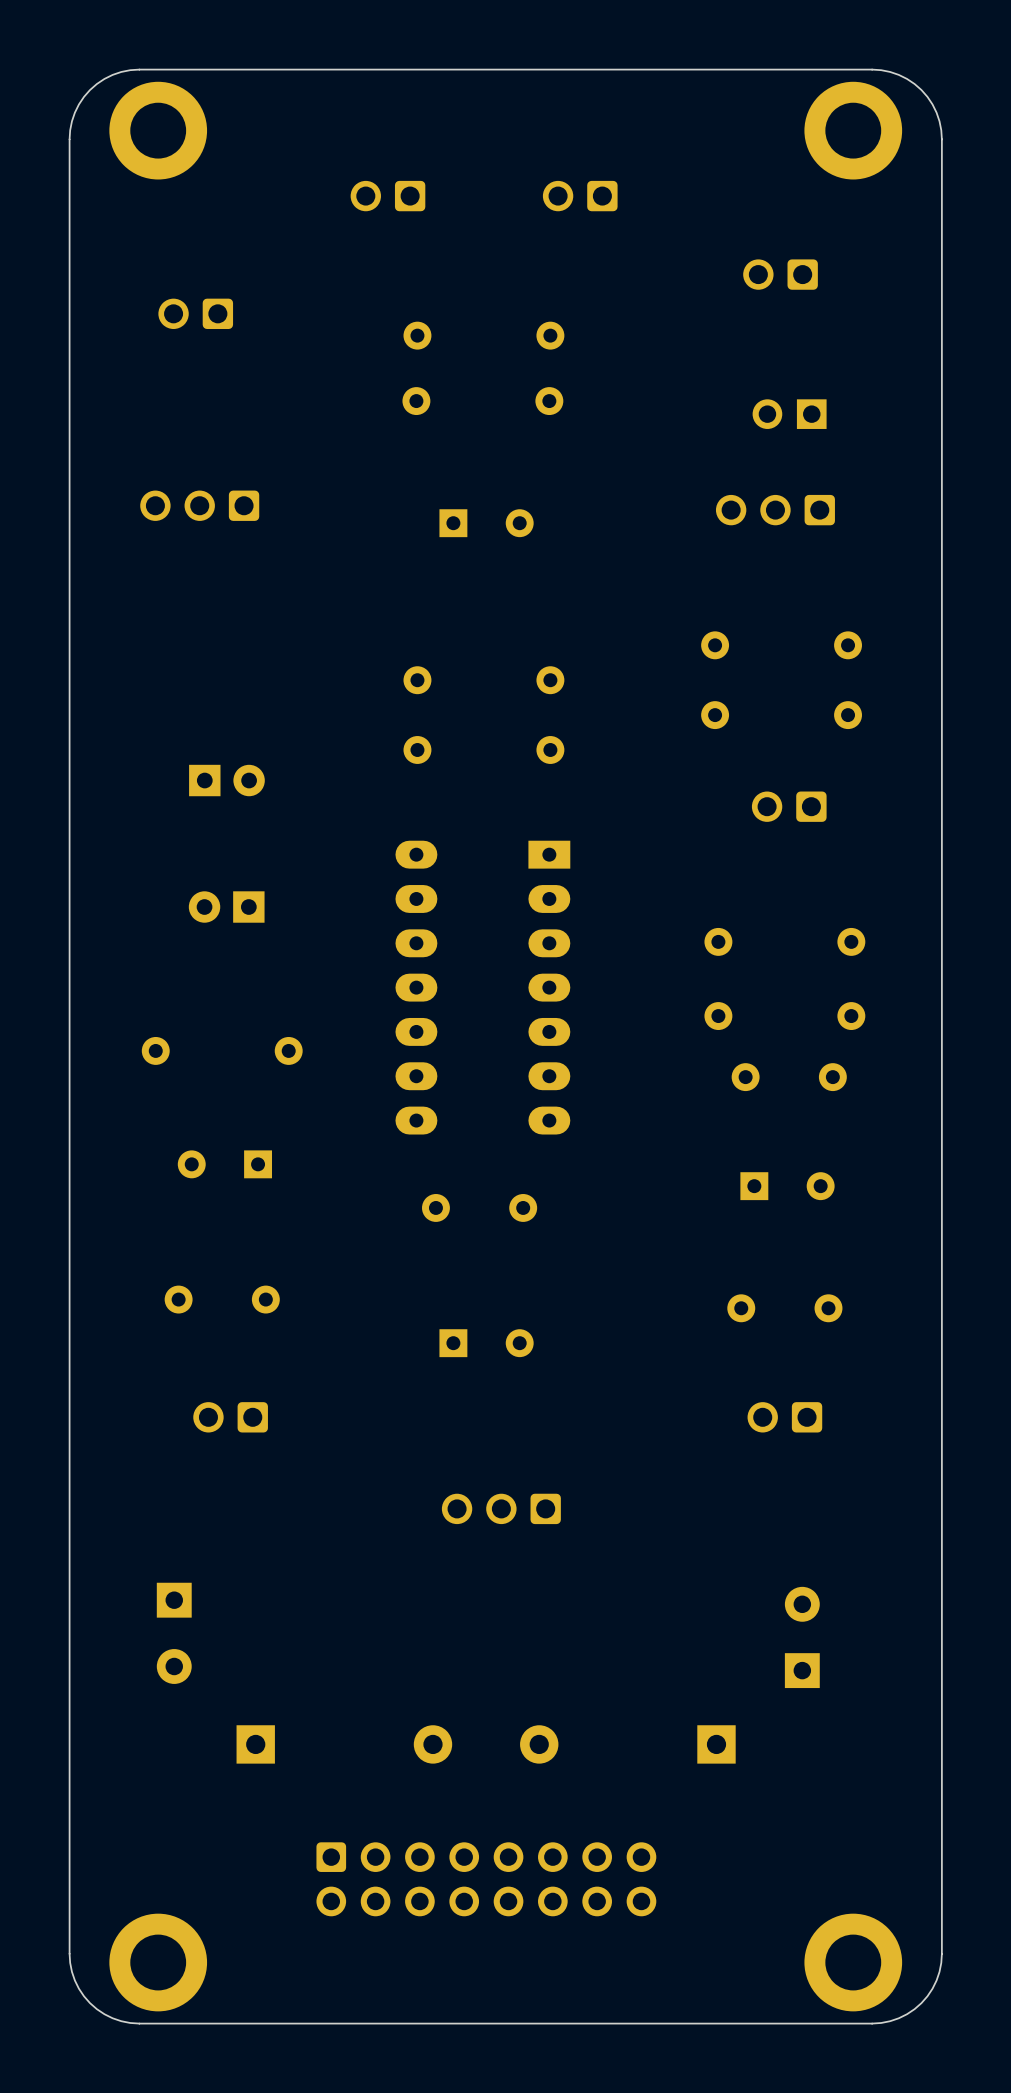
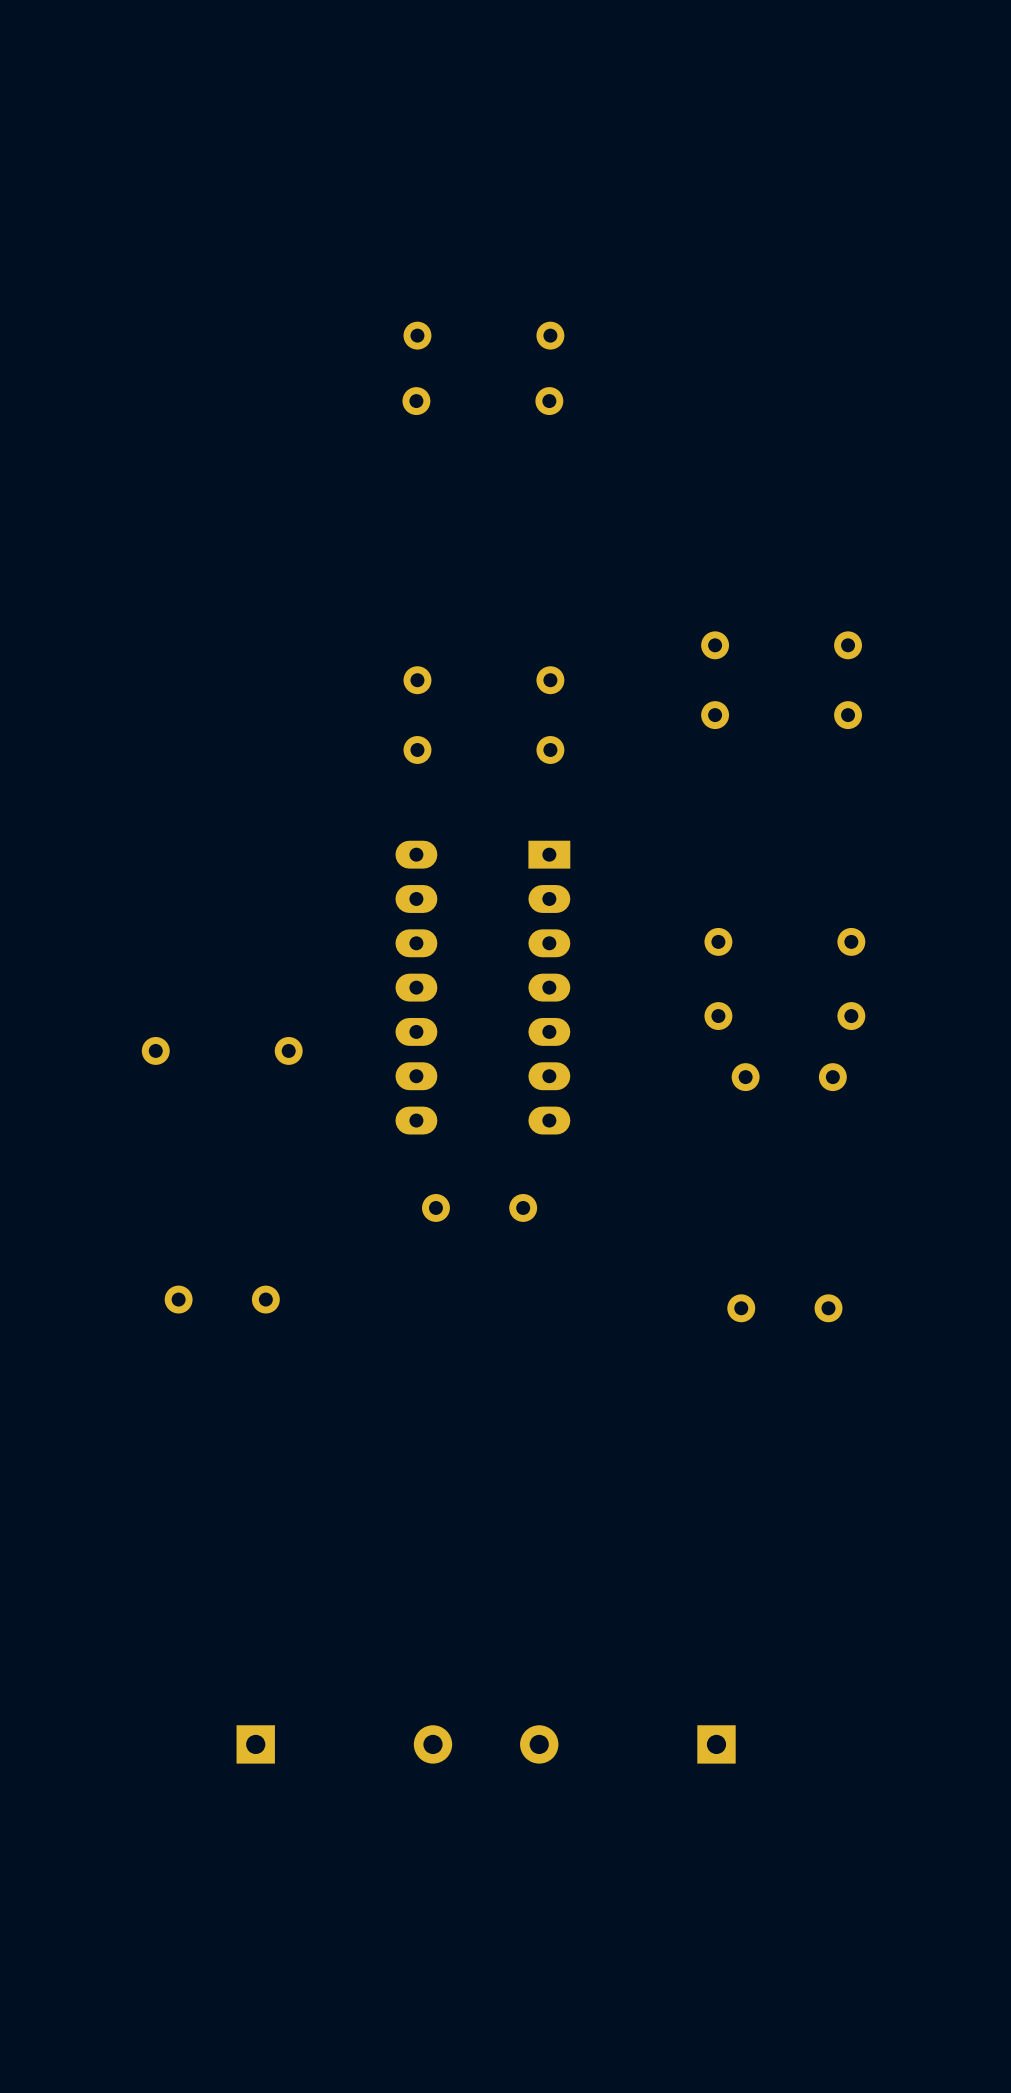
board edge: (872, 69) (139, 69) (121, 71) (104, 78) (90, 90) (74, 112) (69, 139) (69, 1953) (71, 1971) (78, 1988) (90, 2003) (112, 2018) (139, 2023) (872, 2023) (890, 2021) (914, 2009) (927, 1996) (936, 1980) (941, 1953) (941, 139) (936, 112) (921, 90) (898, 74) (872, 69) -> none
part: (158, 130) -> none
part: (853, 130) -> none
part: (387, 196) -> none
part: (580, 196) -> none
part: (780, 274) -> none
part: (195, 313) -> none
part: (789, 414) -> none
part: (199, 505) -> none
part: (775, 510) -> none
part: (486, 523) -> none
part: (226, 780) -> none
part: (789, 806) -> none
part: (226, 907) -> none
part: (224, 1164) -> none
part: (787, 1186) -> none
part: (486, 1343) -> none
part: (230, 1417) -> none
part: (784, 1417) -> none
part: (501, 1508) -> none
part: (174, 1633) -> none
part: (802, 1637) -> none
part: (486, 1879) -> none
part: (158, 1962) -> none
part: (853, 1962) -> none

